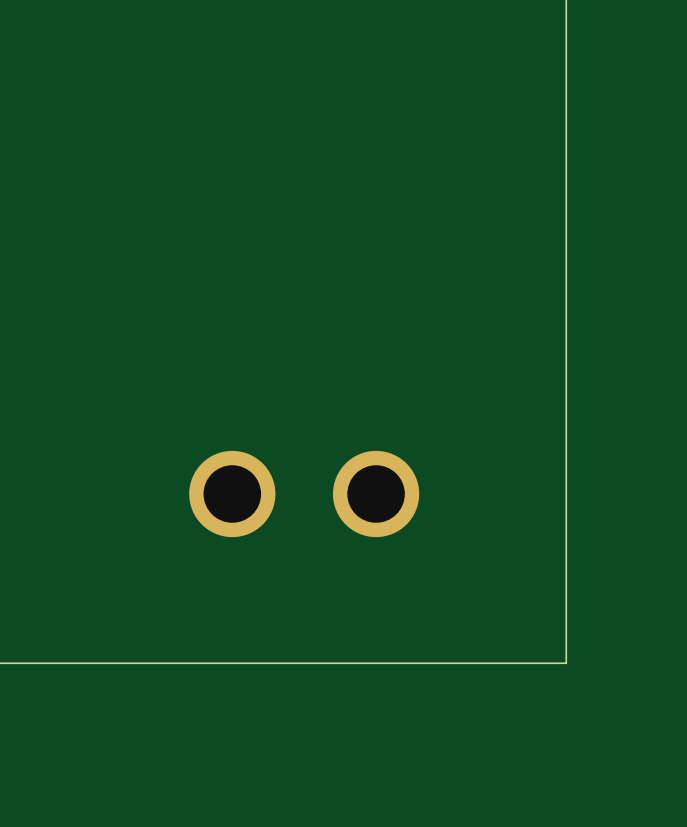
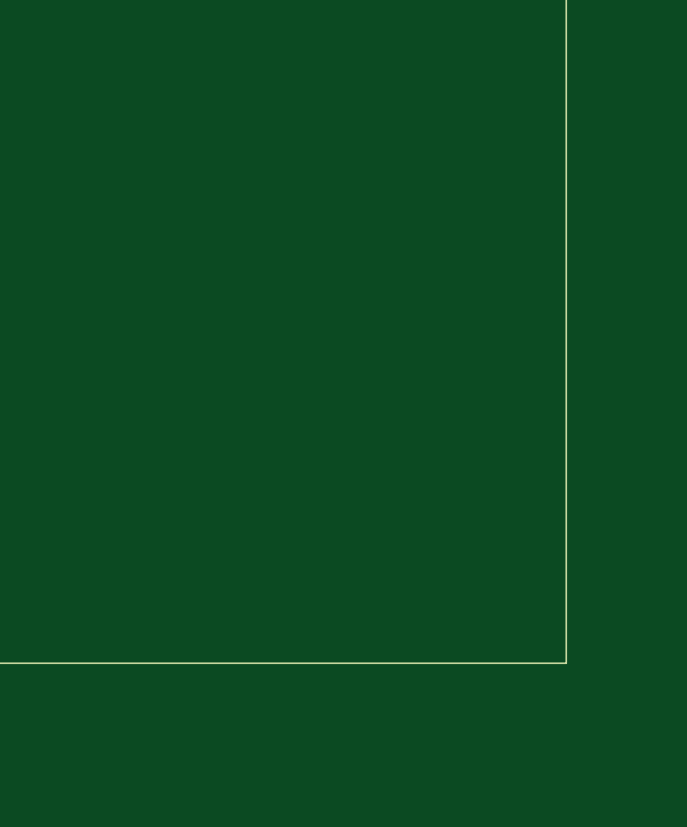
part: (304, 494) -> none

